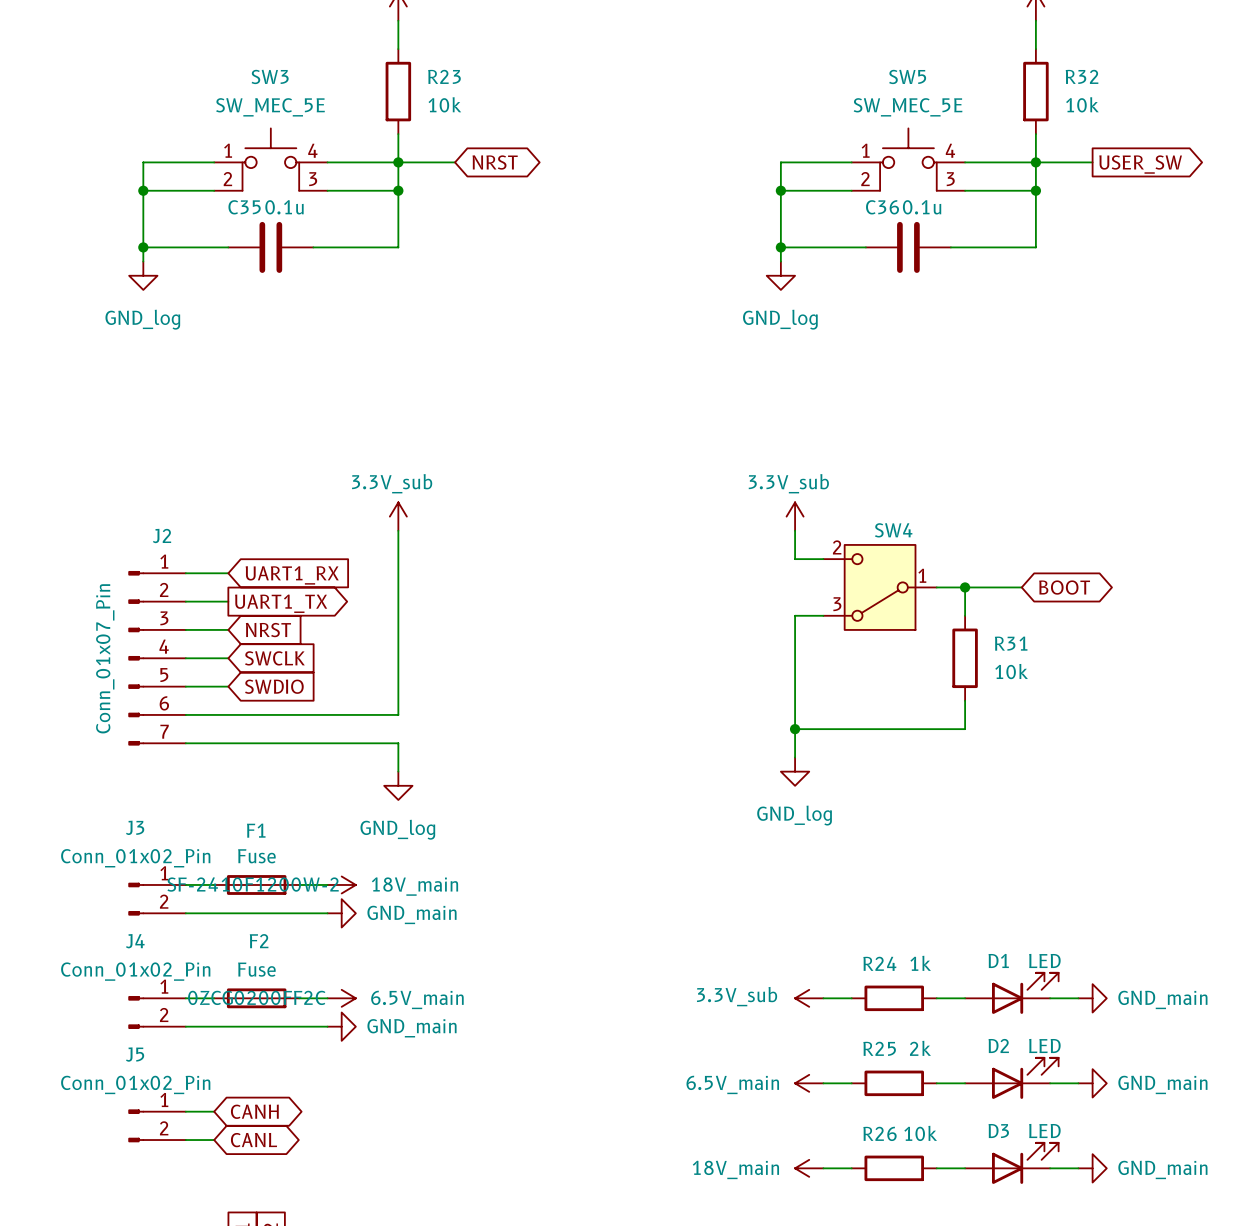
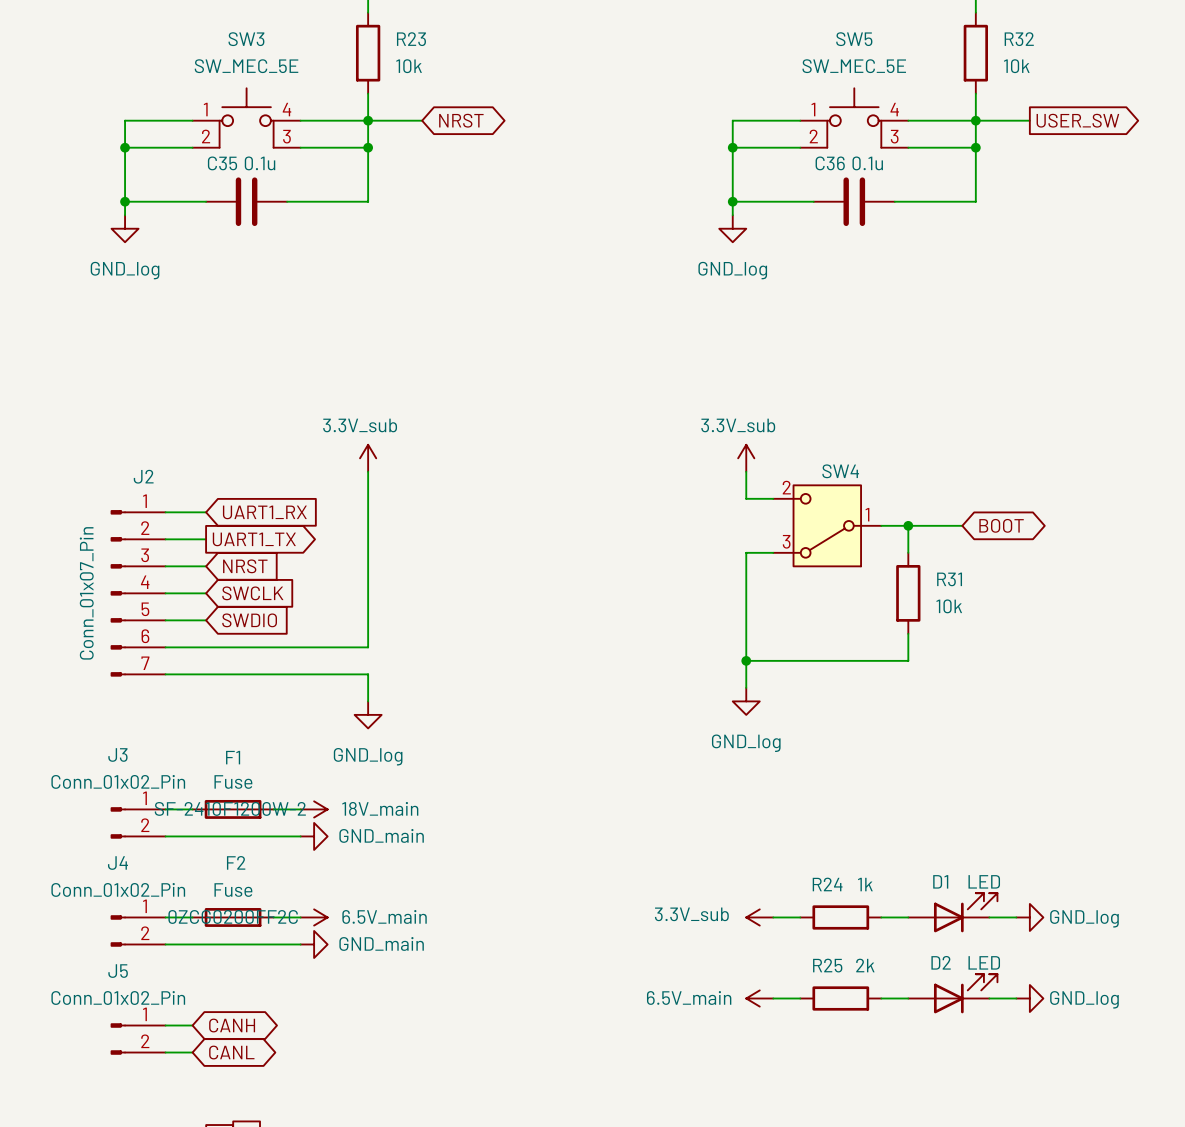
power symbol: GND_main (1092, 998) -> GND_log (1029, 917)
power symbol: GND_main (1092, 1083) -> GND_log (1029, 998)
D3: LED (1011, 1163) -> none
power symbol: 18V_main (809, 1168) -> none
wire: (823, 1168) (851, 1168) -> none
R26: 10k (894, 1168) -> none
wire: (936, 1168) (965, 1168) -> none
wire: (1050, 1168) (1078, 1168) -> none
power symbol: GND_main (1092, 1168) -> none

